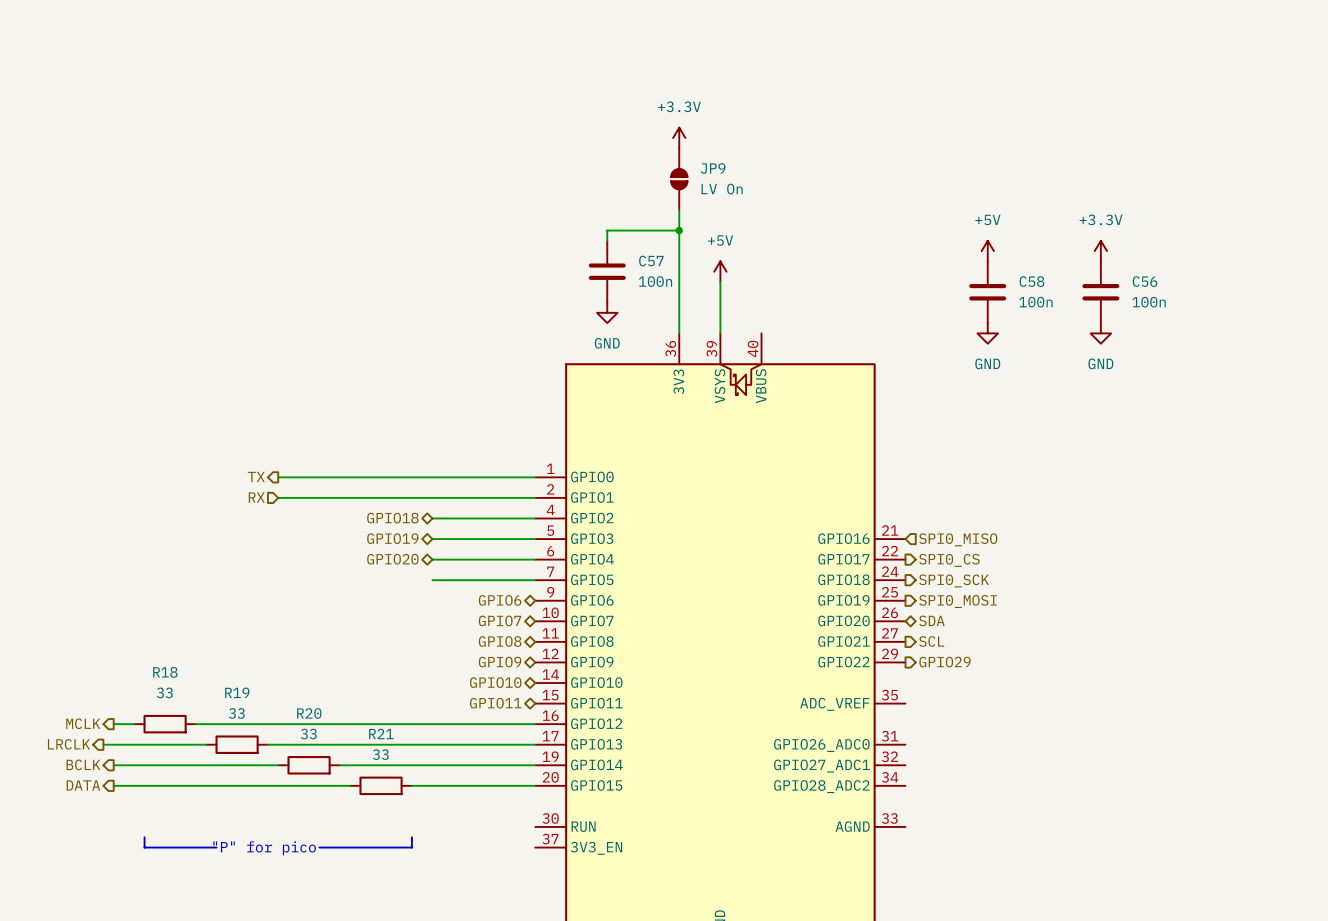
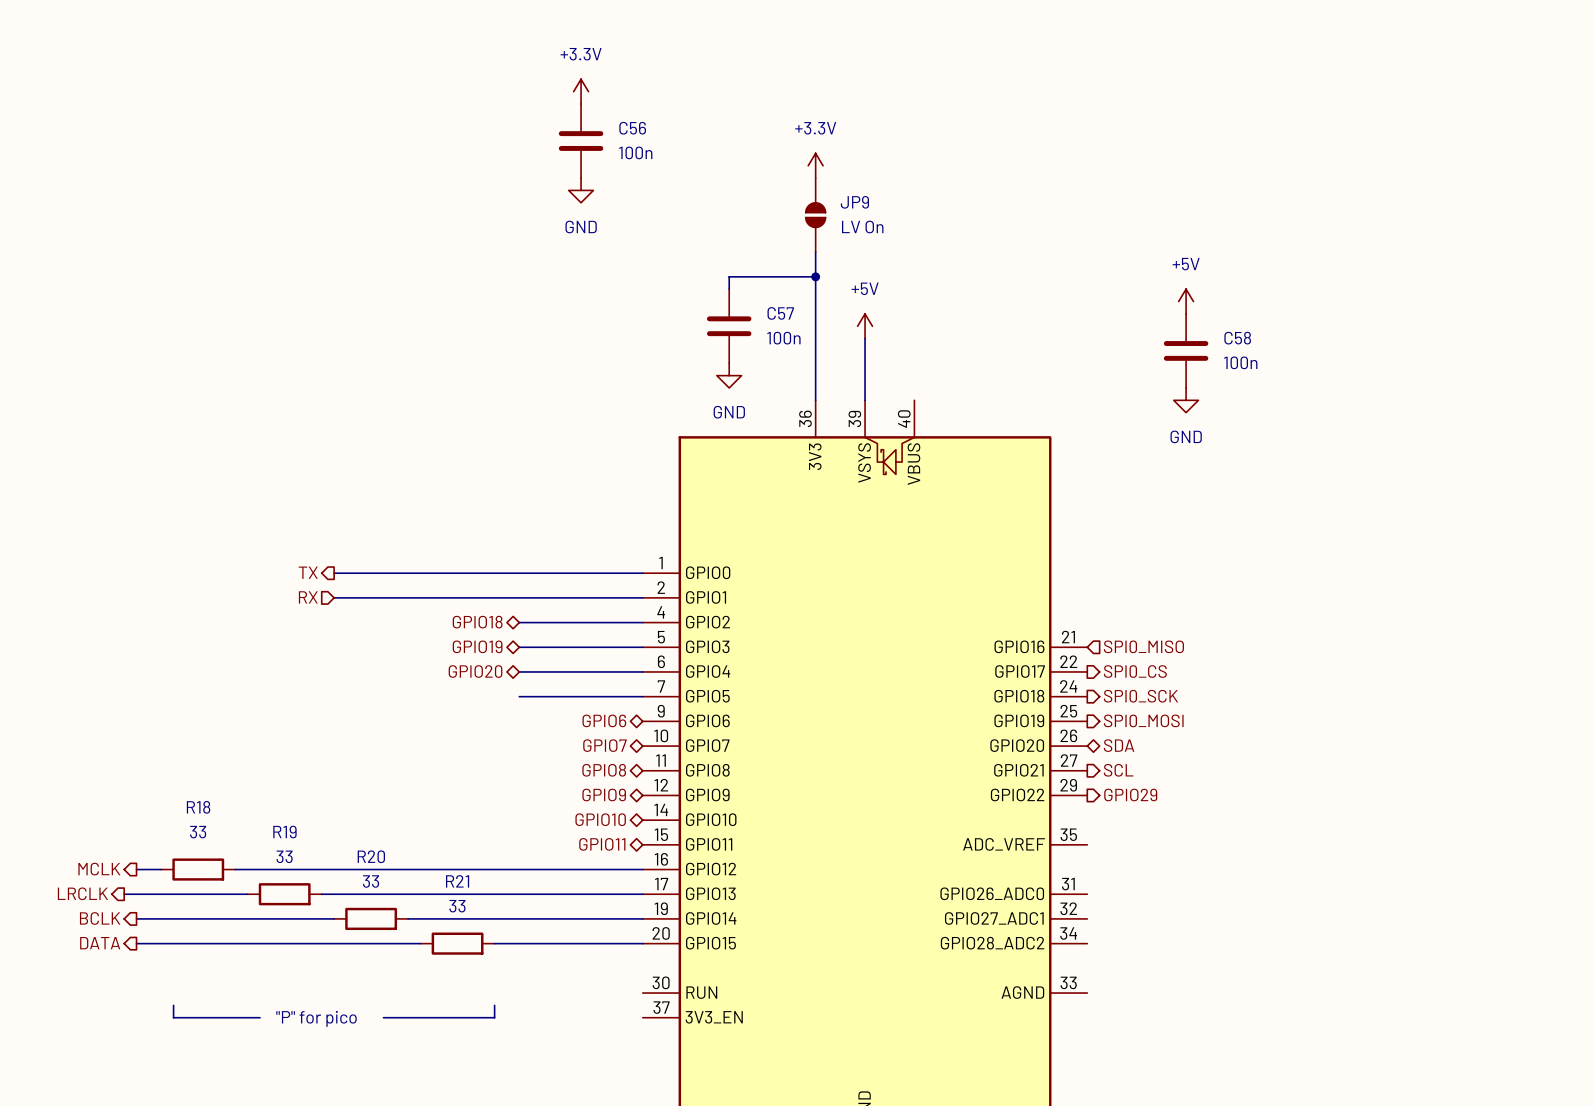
power symbol: none -> +3.3V (581, 91)
power symbol: none -> GND (581, 190)
power symbol: +3.3V (1100, 251) -> none
C56 position: (1100, 292) -> (581, 141)
power symbol: GND (1100, 333) -> none

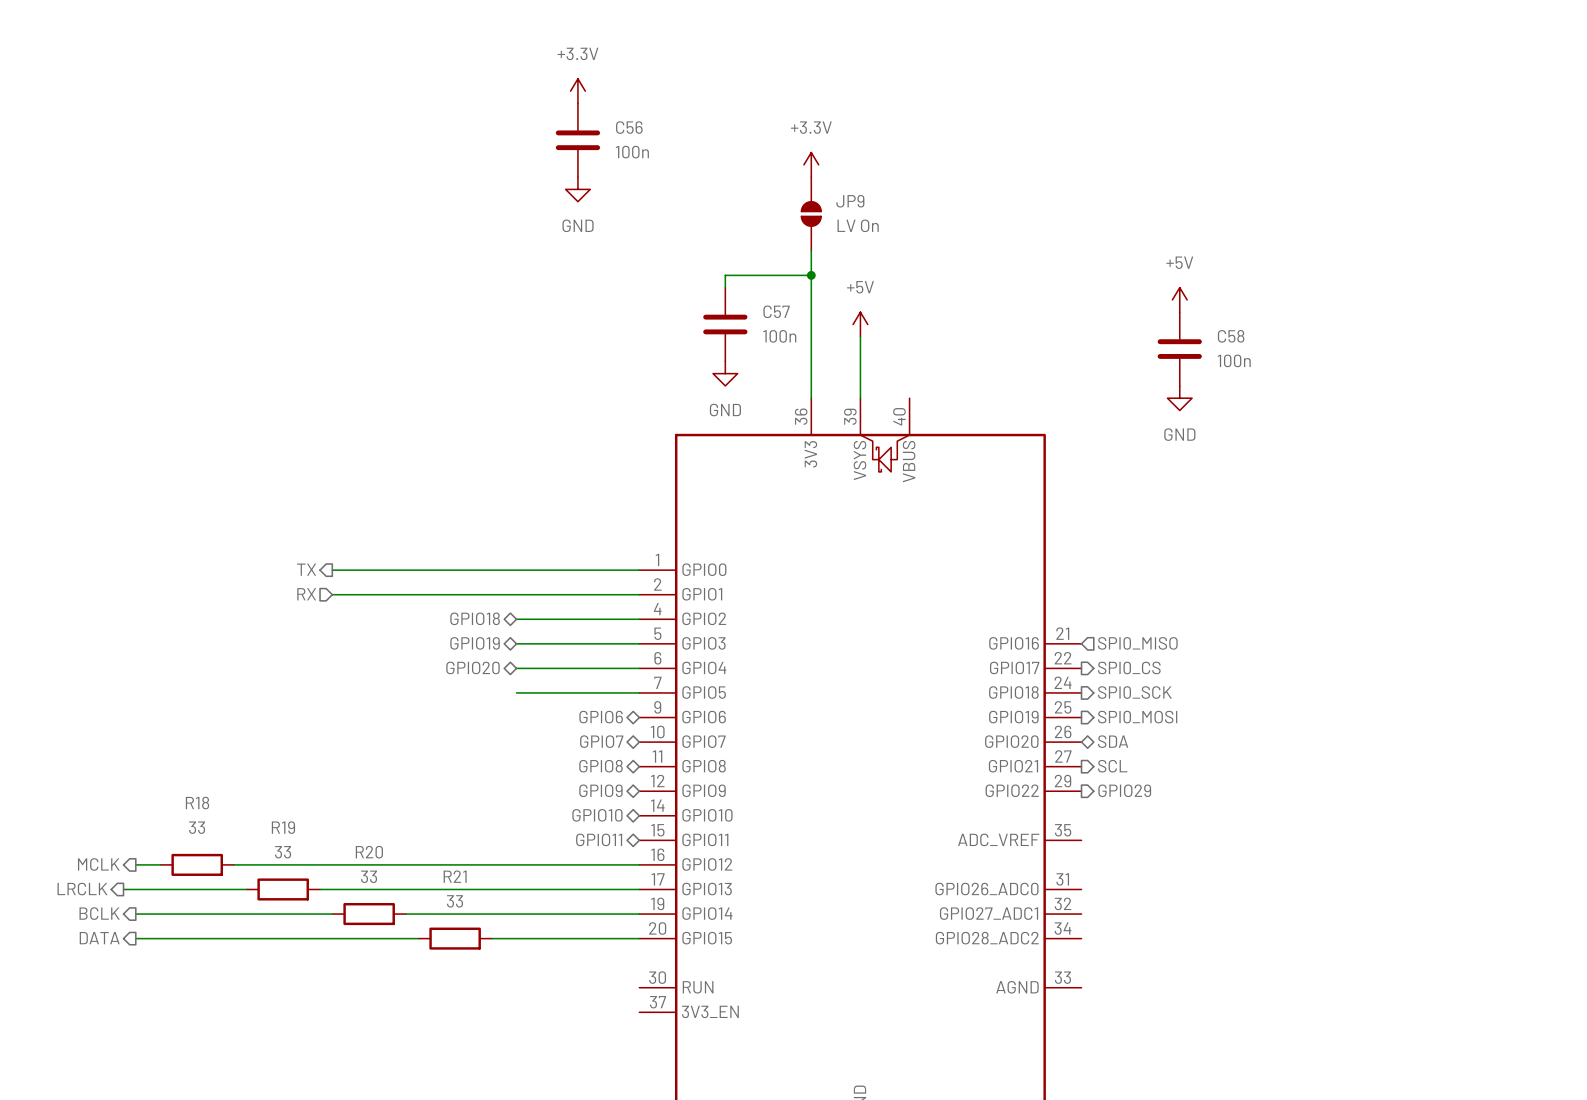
line: (173, 1005) (173, 1017) (260, 1017) -> none
line: (494, 1005) (494, 1017) (383, 1017) -> none
text: "P" for pico (316, 1018) -> none

